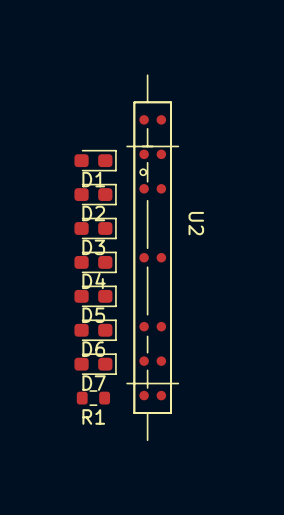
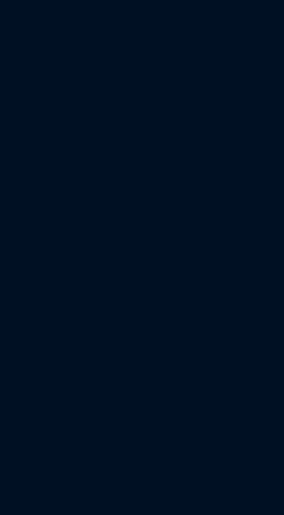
D1: (95, 160) -> none
D2: (95, 194) -> none
D3: (95, 228) -> none
U2: (152, 257) -> none
D4: (95, 262) -> none
D5: (95, 296) -> none
D6: (95, 330) -> none
D7: (95, 364) -> none
R1: (93, 398) -> none

